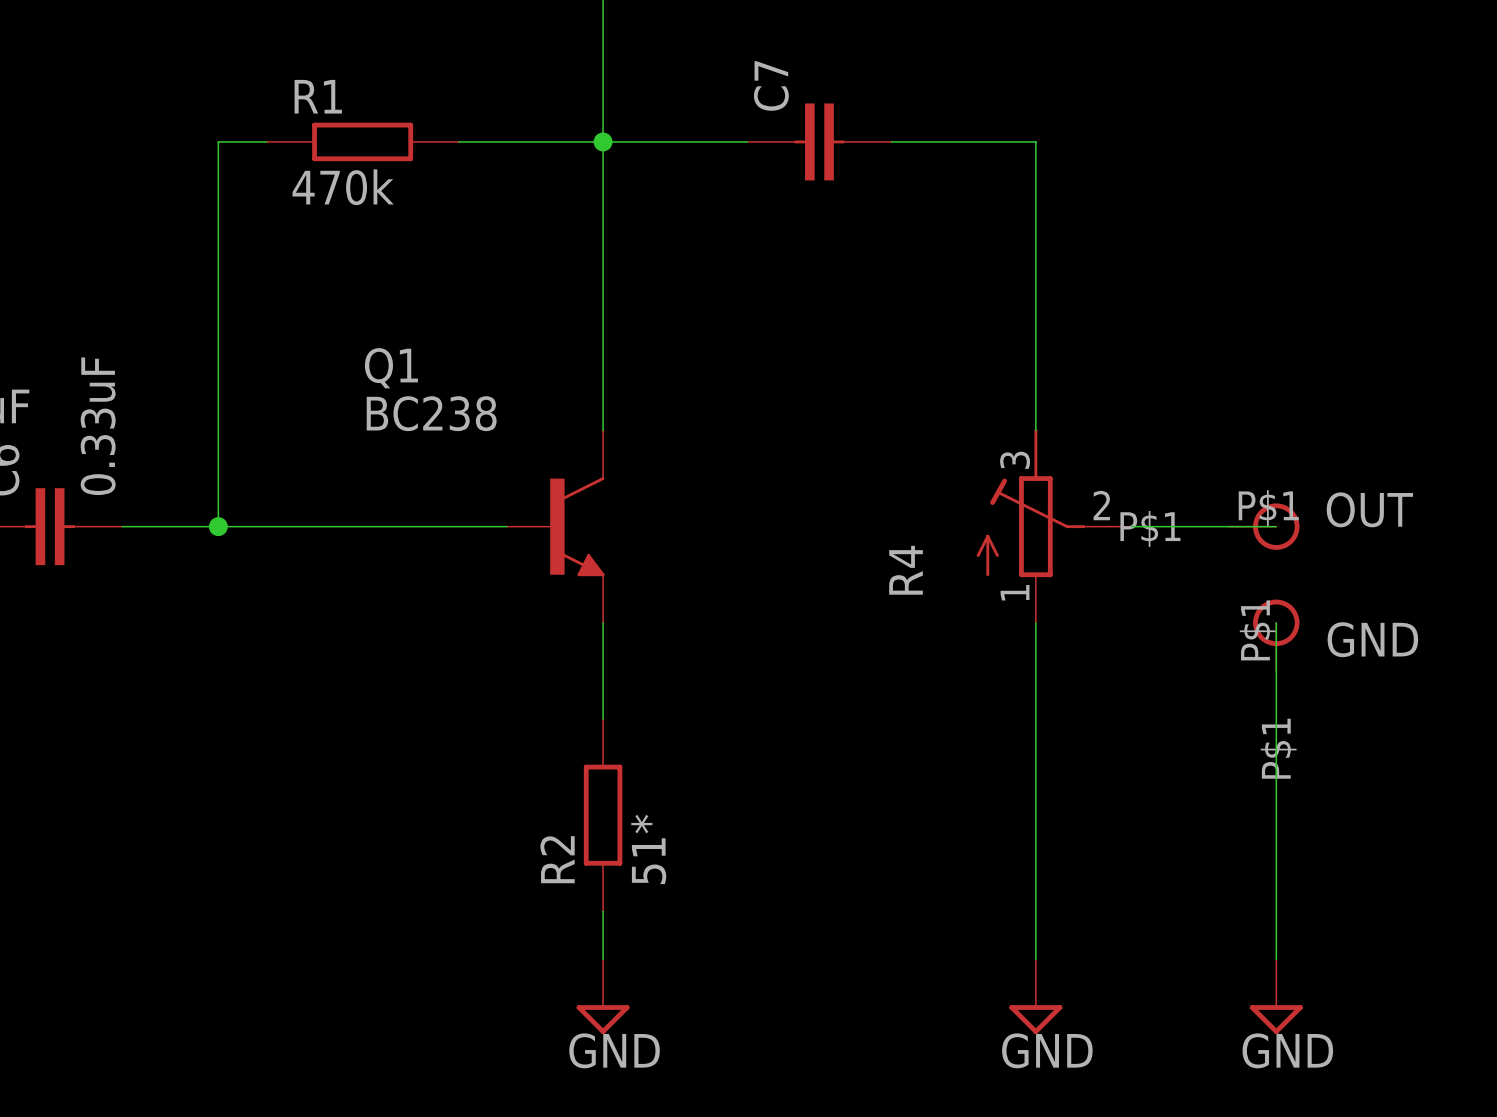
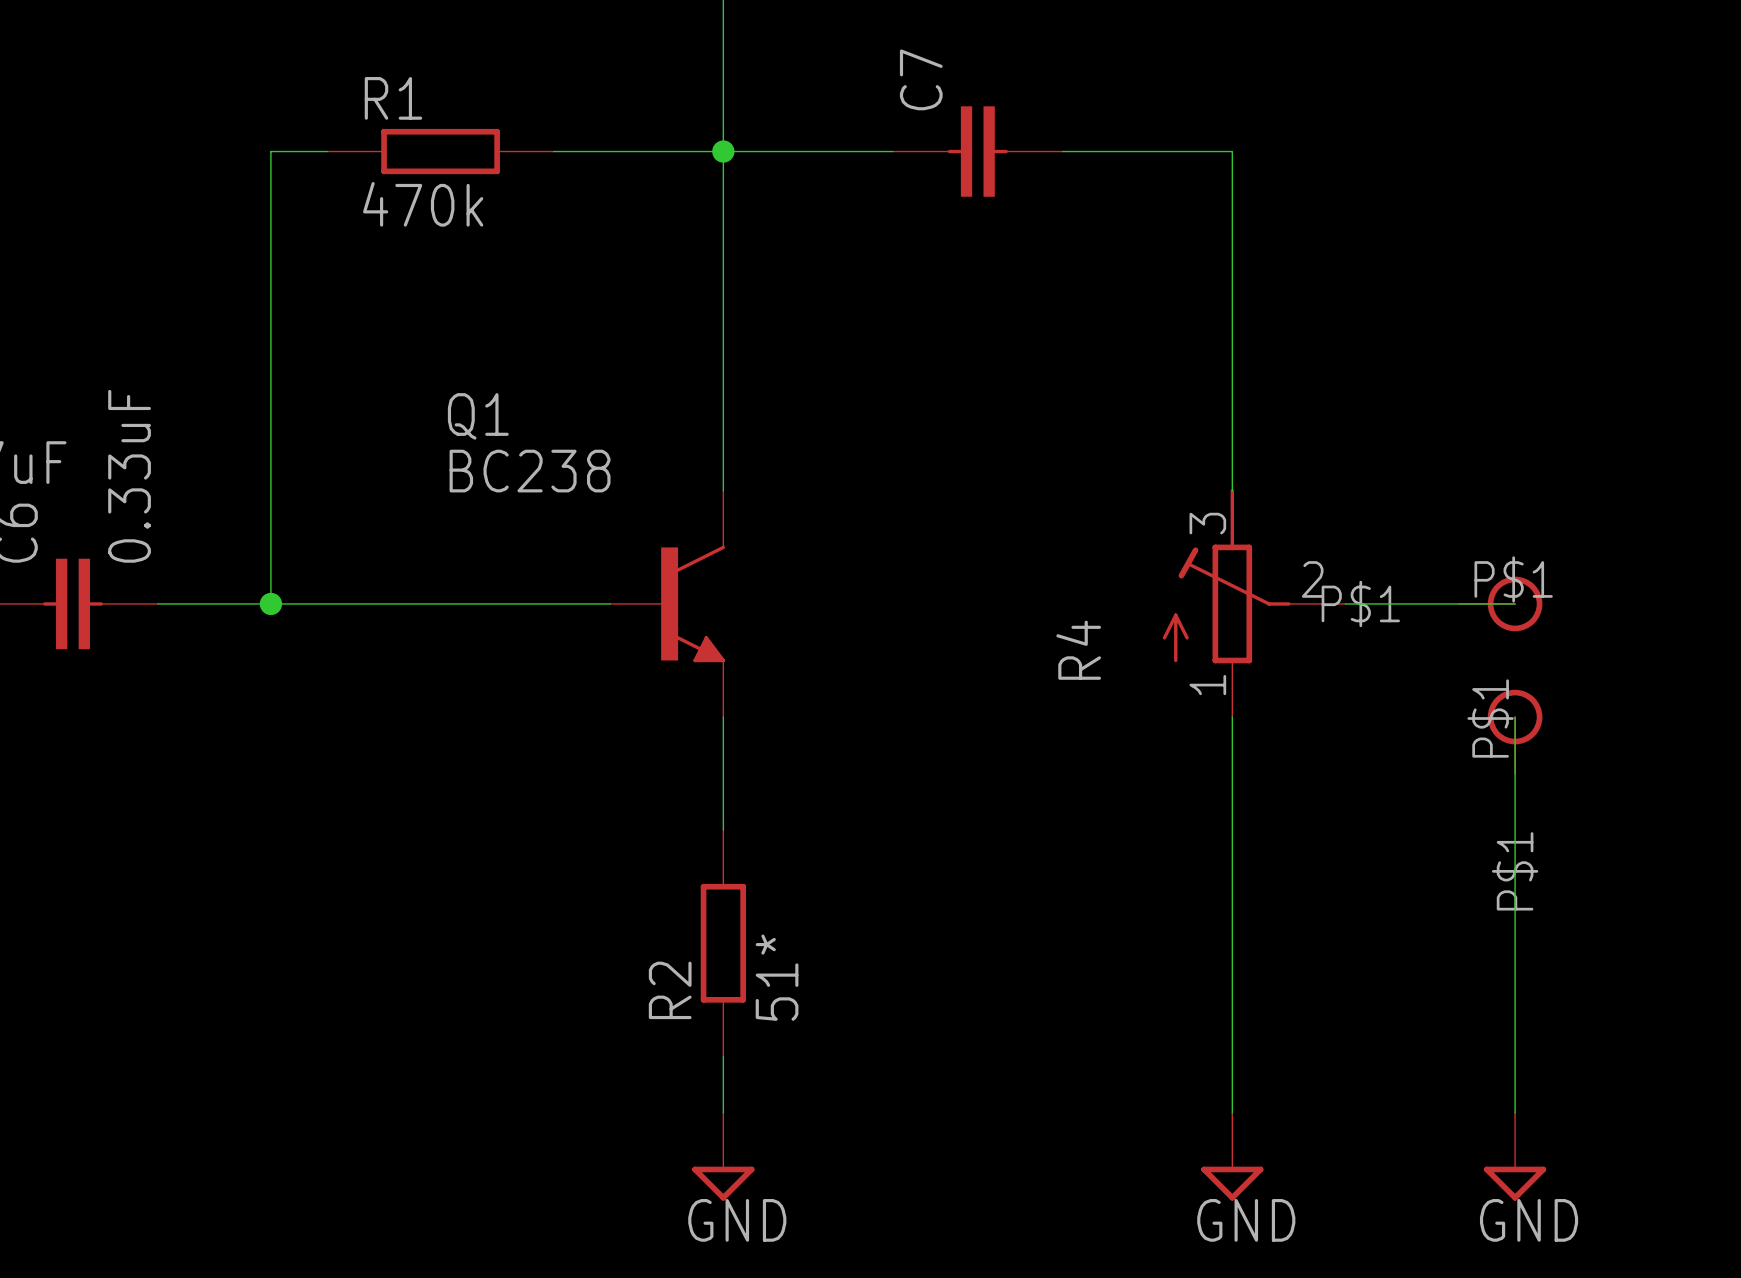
label: OUT (1369, 509) -> none
label: GND (1372, 639) -> none

